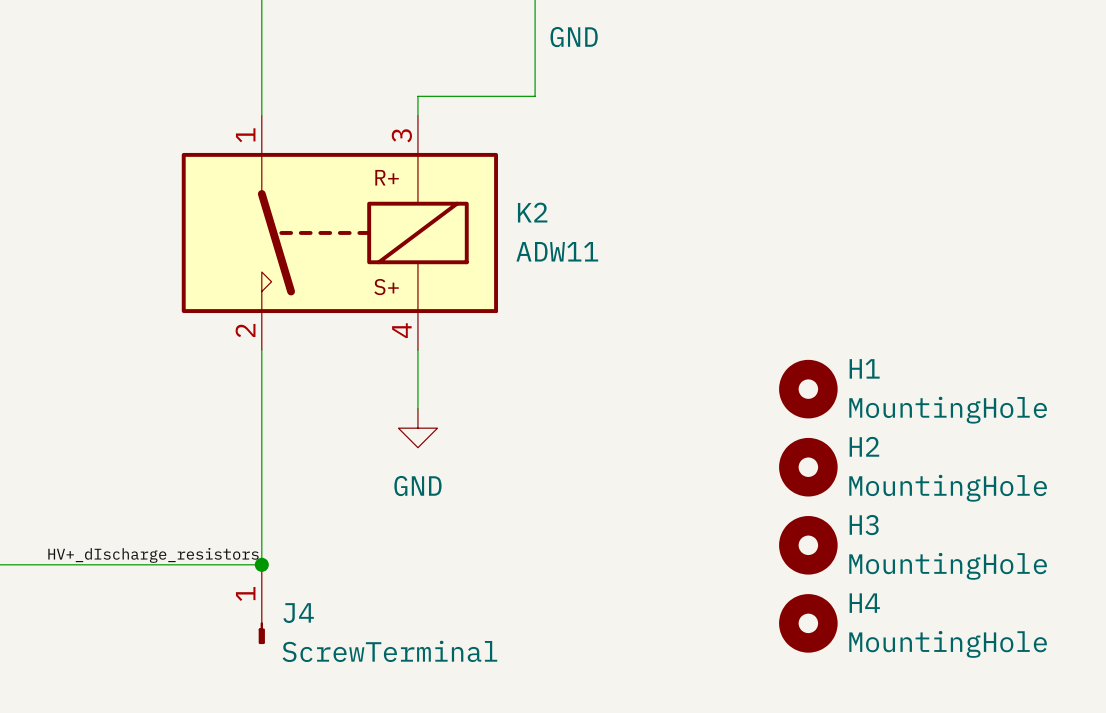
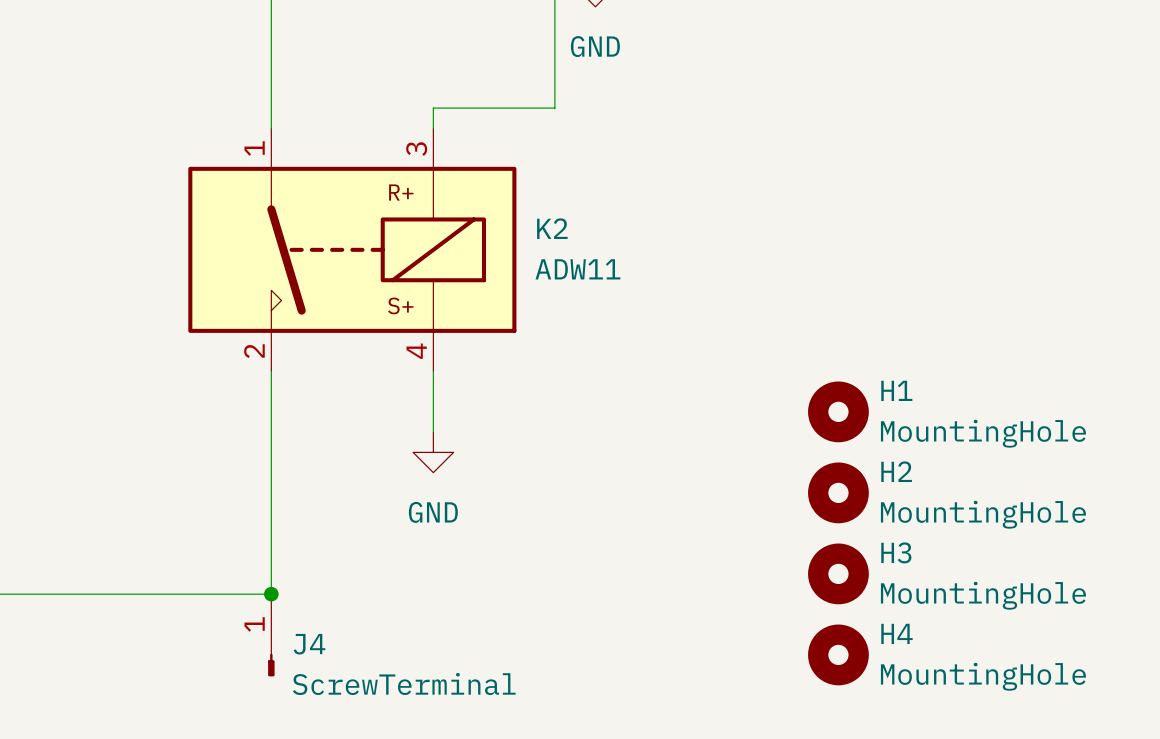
label: HV+_dIscharge_resistors (153, 555) -> none

